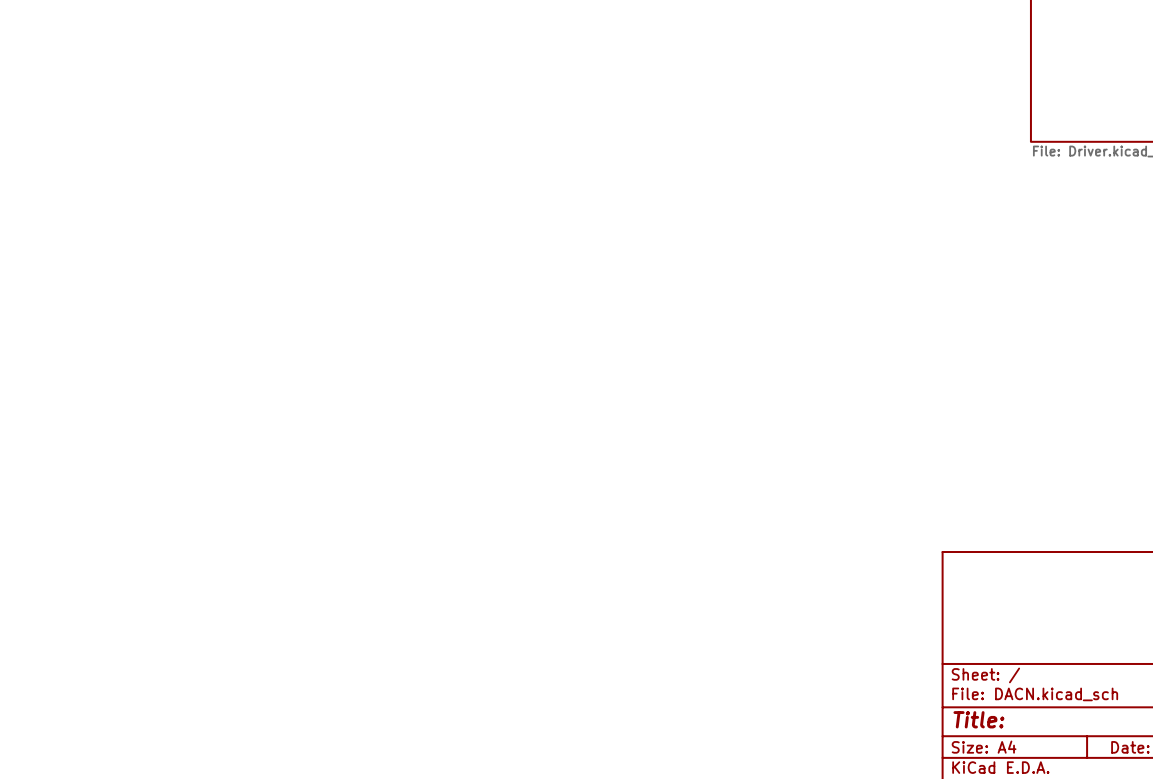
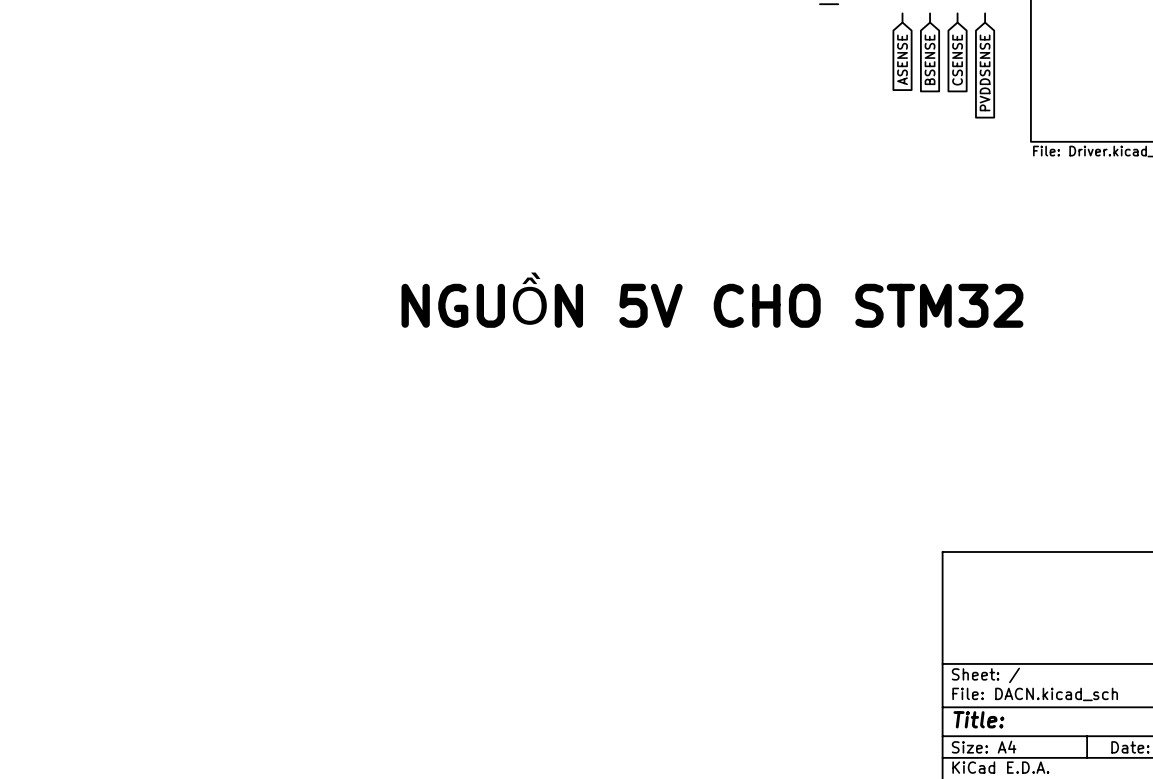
wire: none -> (819, 4) (838, 4)
wire: none -> (902, 13) (902, 22)
wire: none -> (930, 13) (930, 22)
wire: none -> (957, 13) (957, 22)
wire: none -> (985, 13) (985, 22)
global label: none -> ASENSE (902, 59)
global label: none -> BSENSE (930, 59)
global label: none -> CSENSE (957, 60)
global label: none -> PVDDSENSE (985, 72)
text: none -> NGUỒN 5V CHO STM32 (712, 298)

